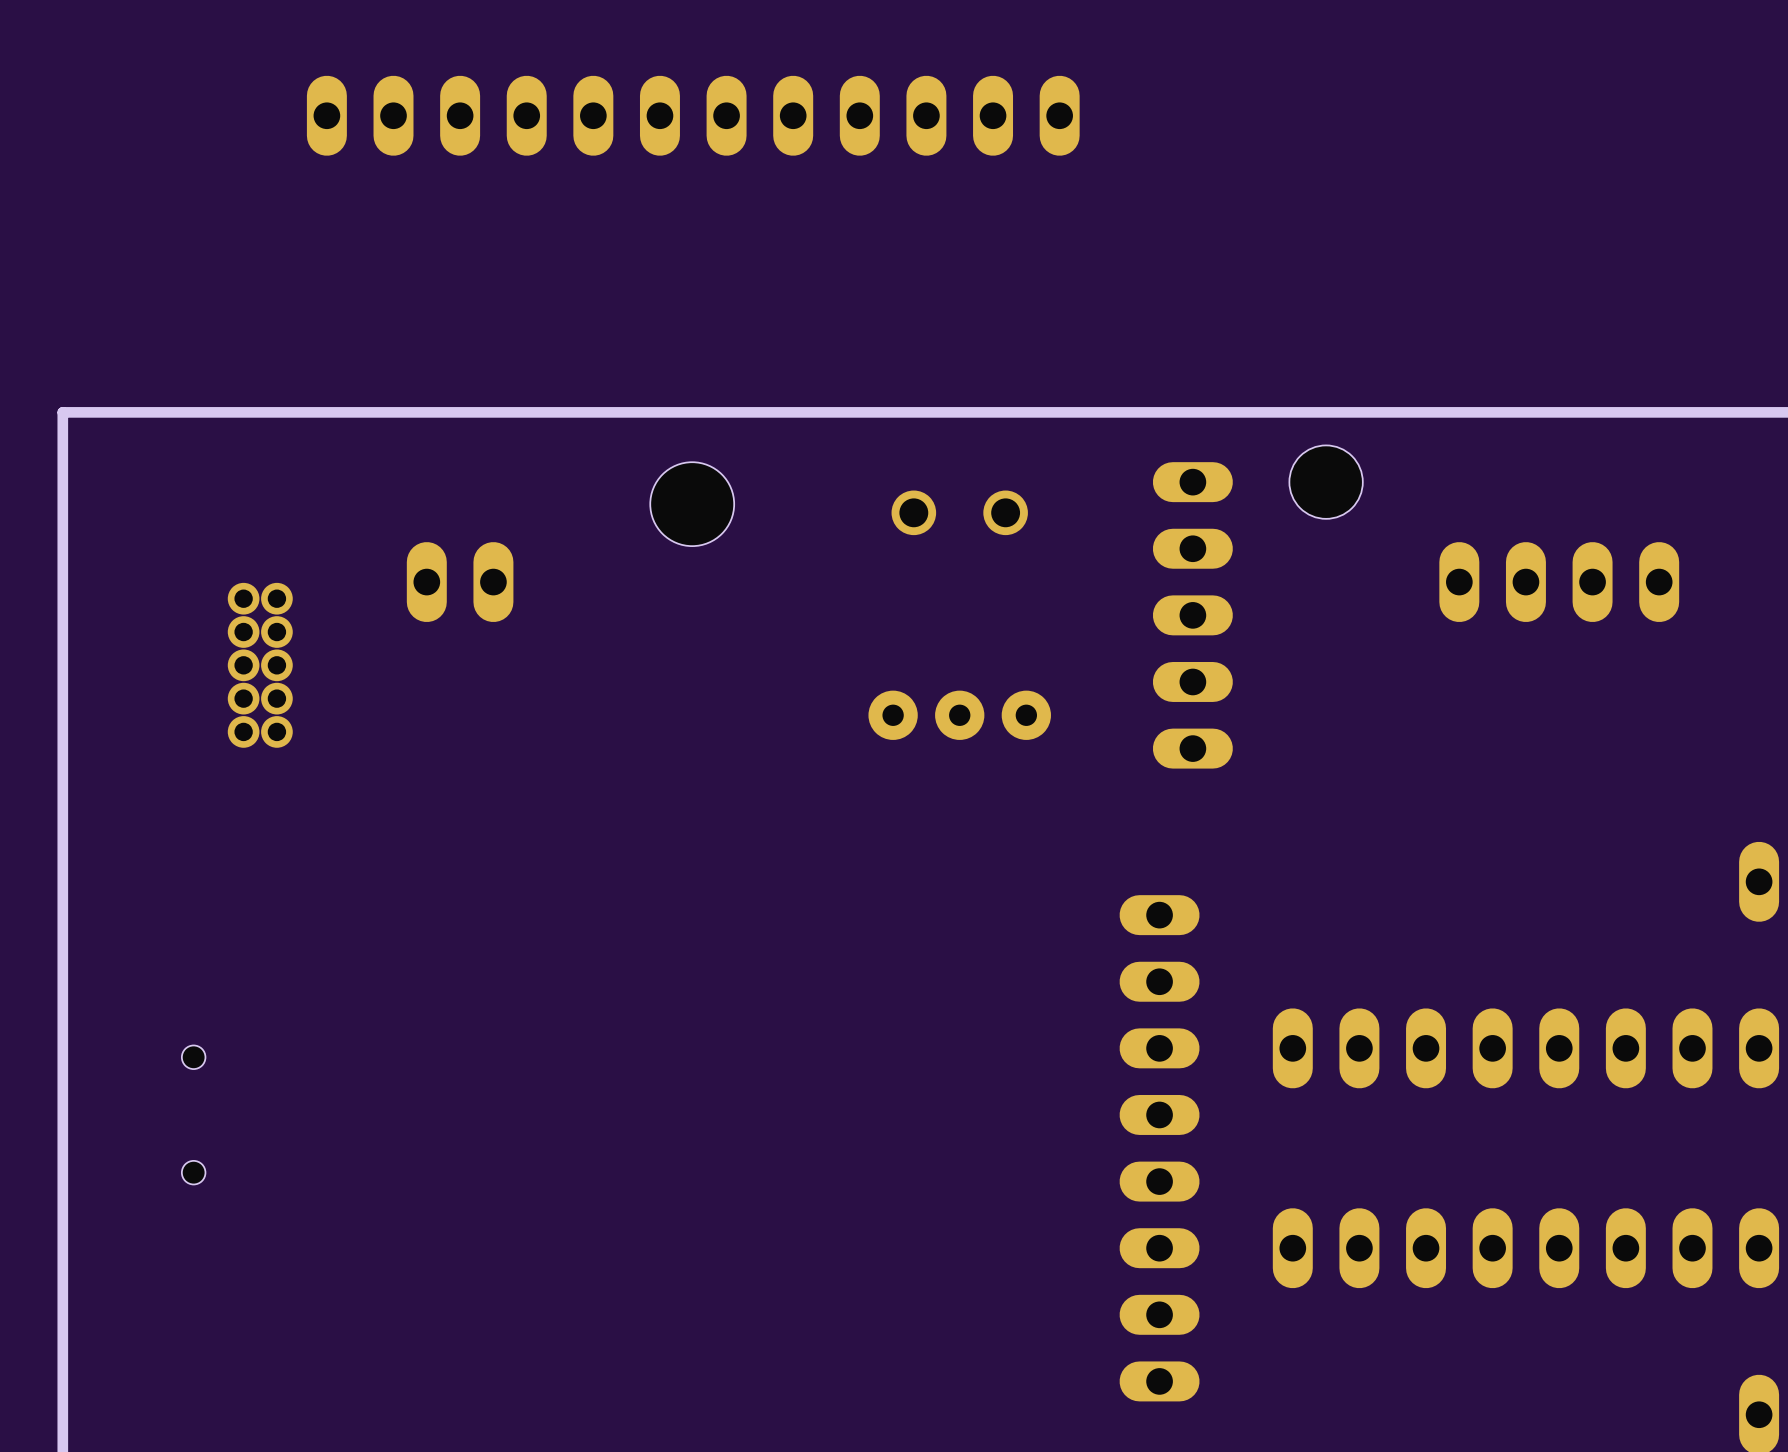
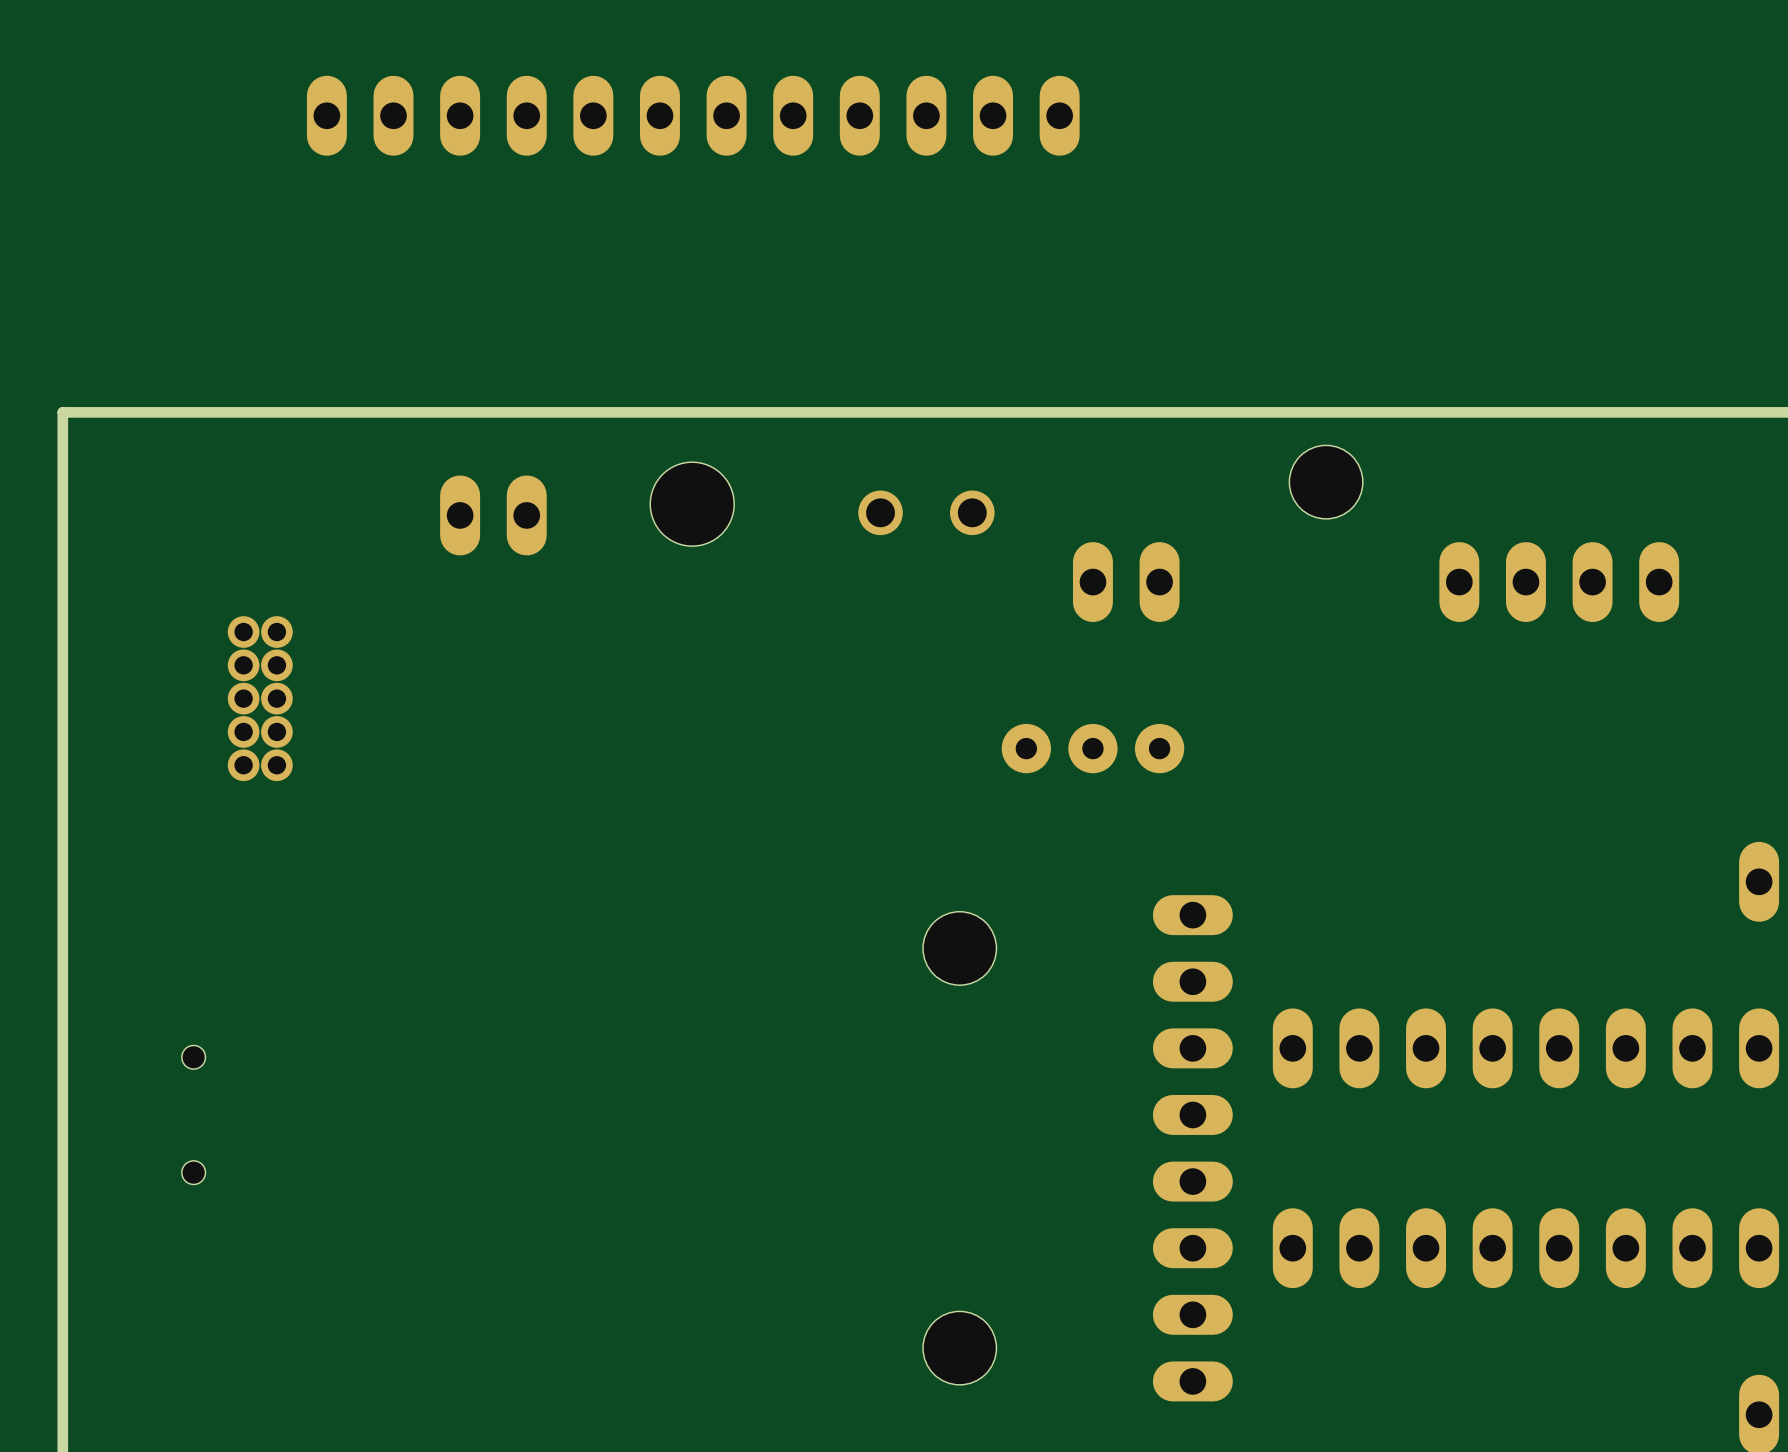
part position: (959, 512) -> (926, 512)
part: (1192, 548) -> none
part position: (460, 582) -> (493, 515)
part position: (260, 665) -> (260, 698)
part position: (959, 715) -> (1092, 748)
part rotation: 0° (1192, 715) -> 90° clockwise (1126, 582)
part position: (1192, 715) -> (1126, 582)
part: none -> (959, 948)
part position: (1159, 1148) -> (1192, 1148)
part: none -> (959, 1348)

